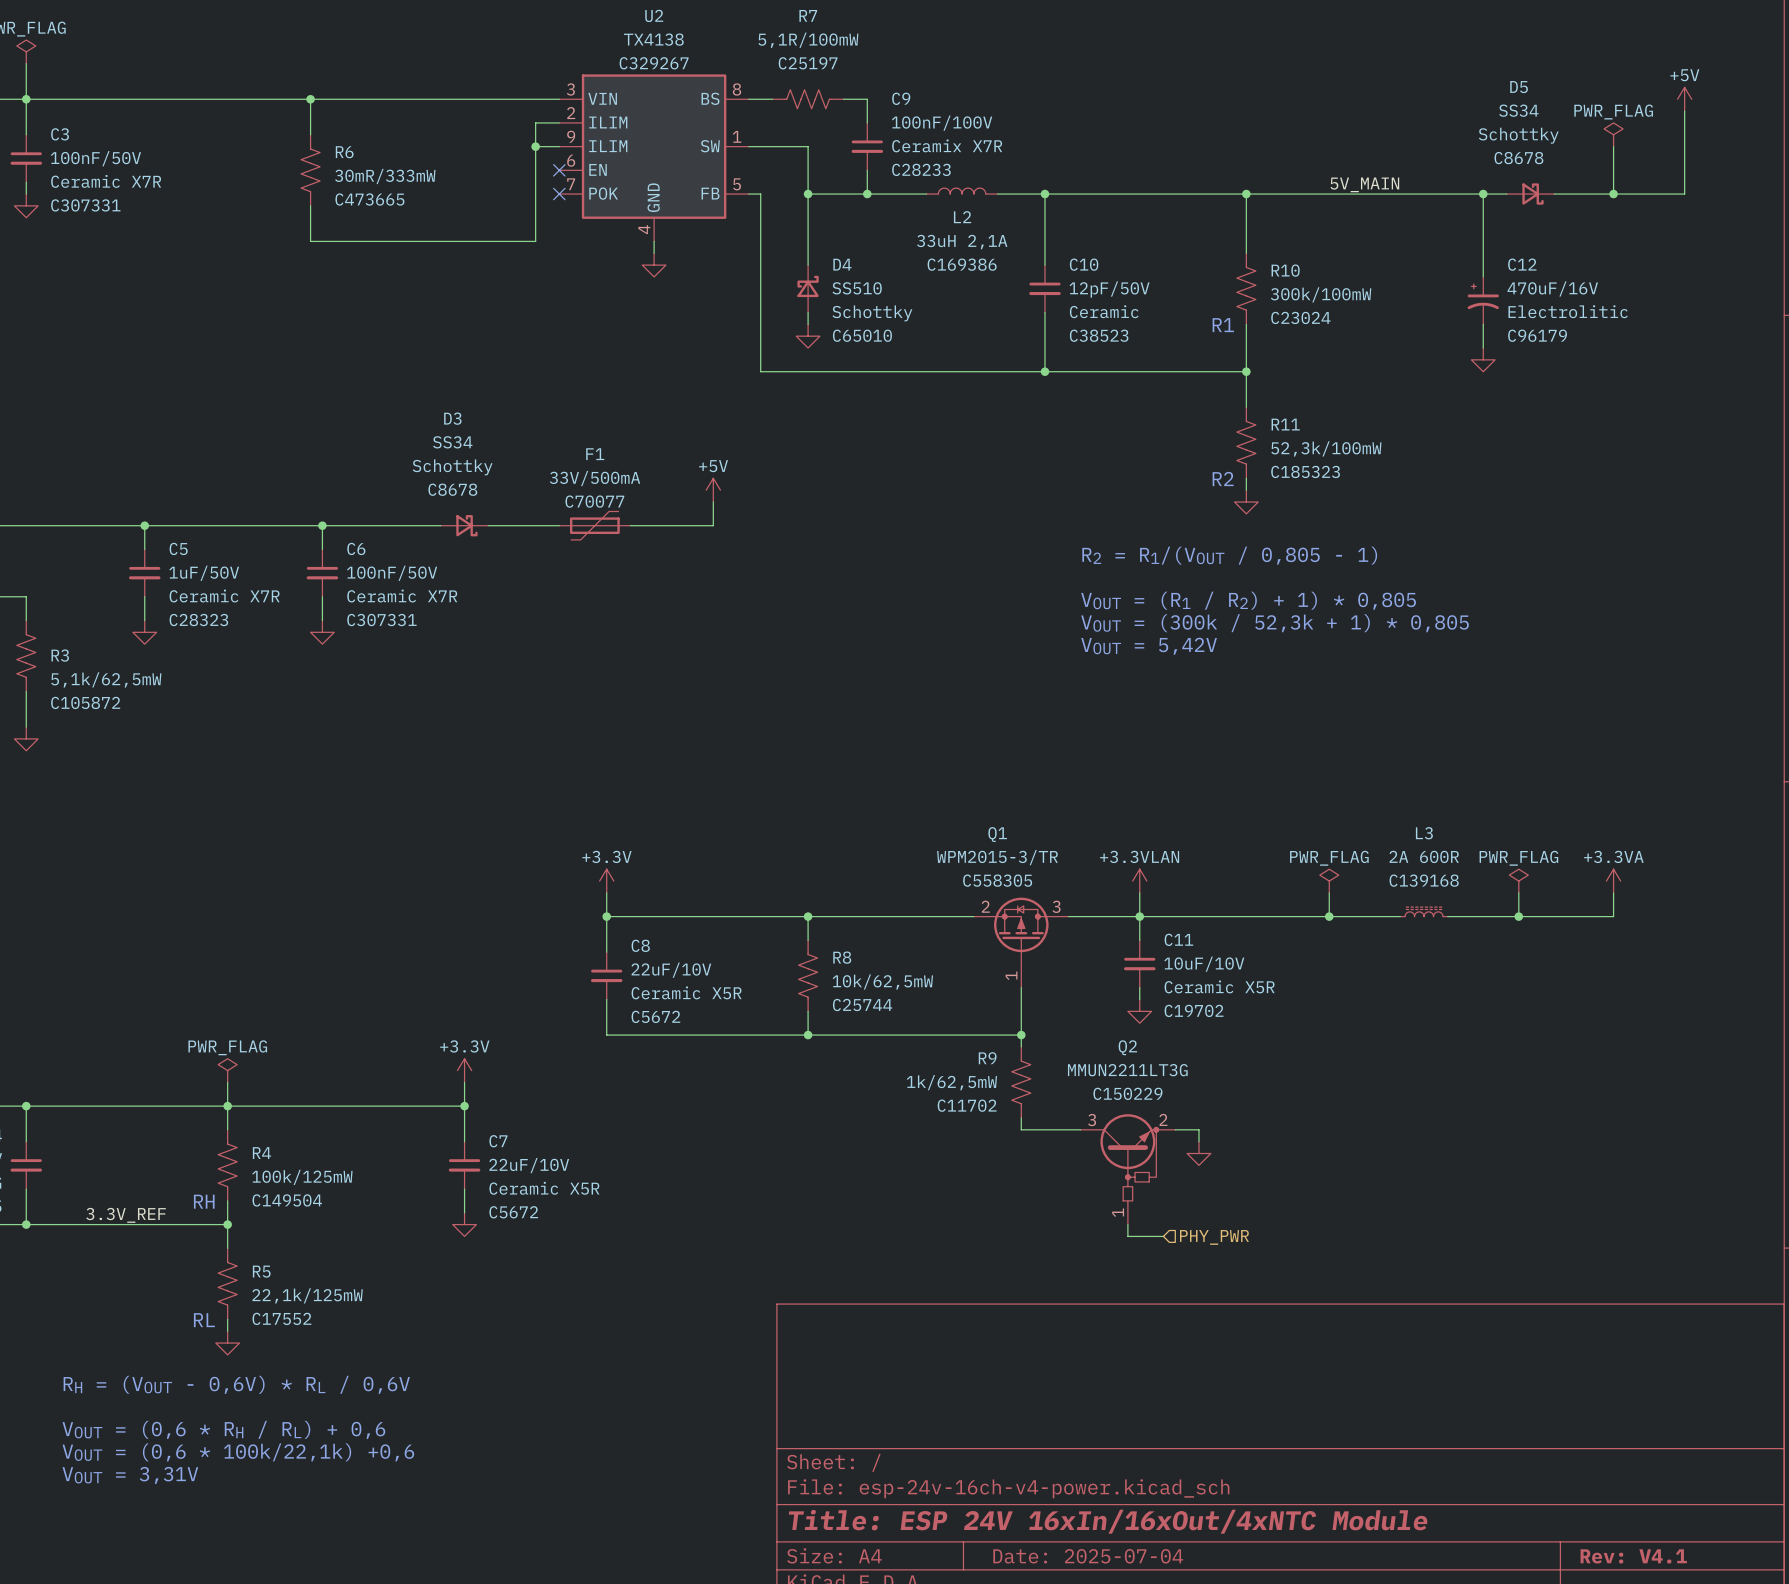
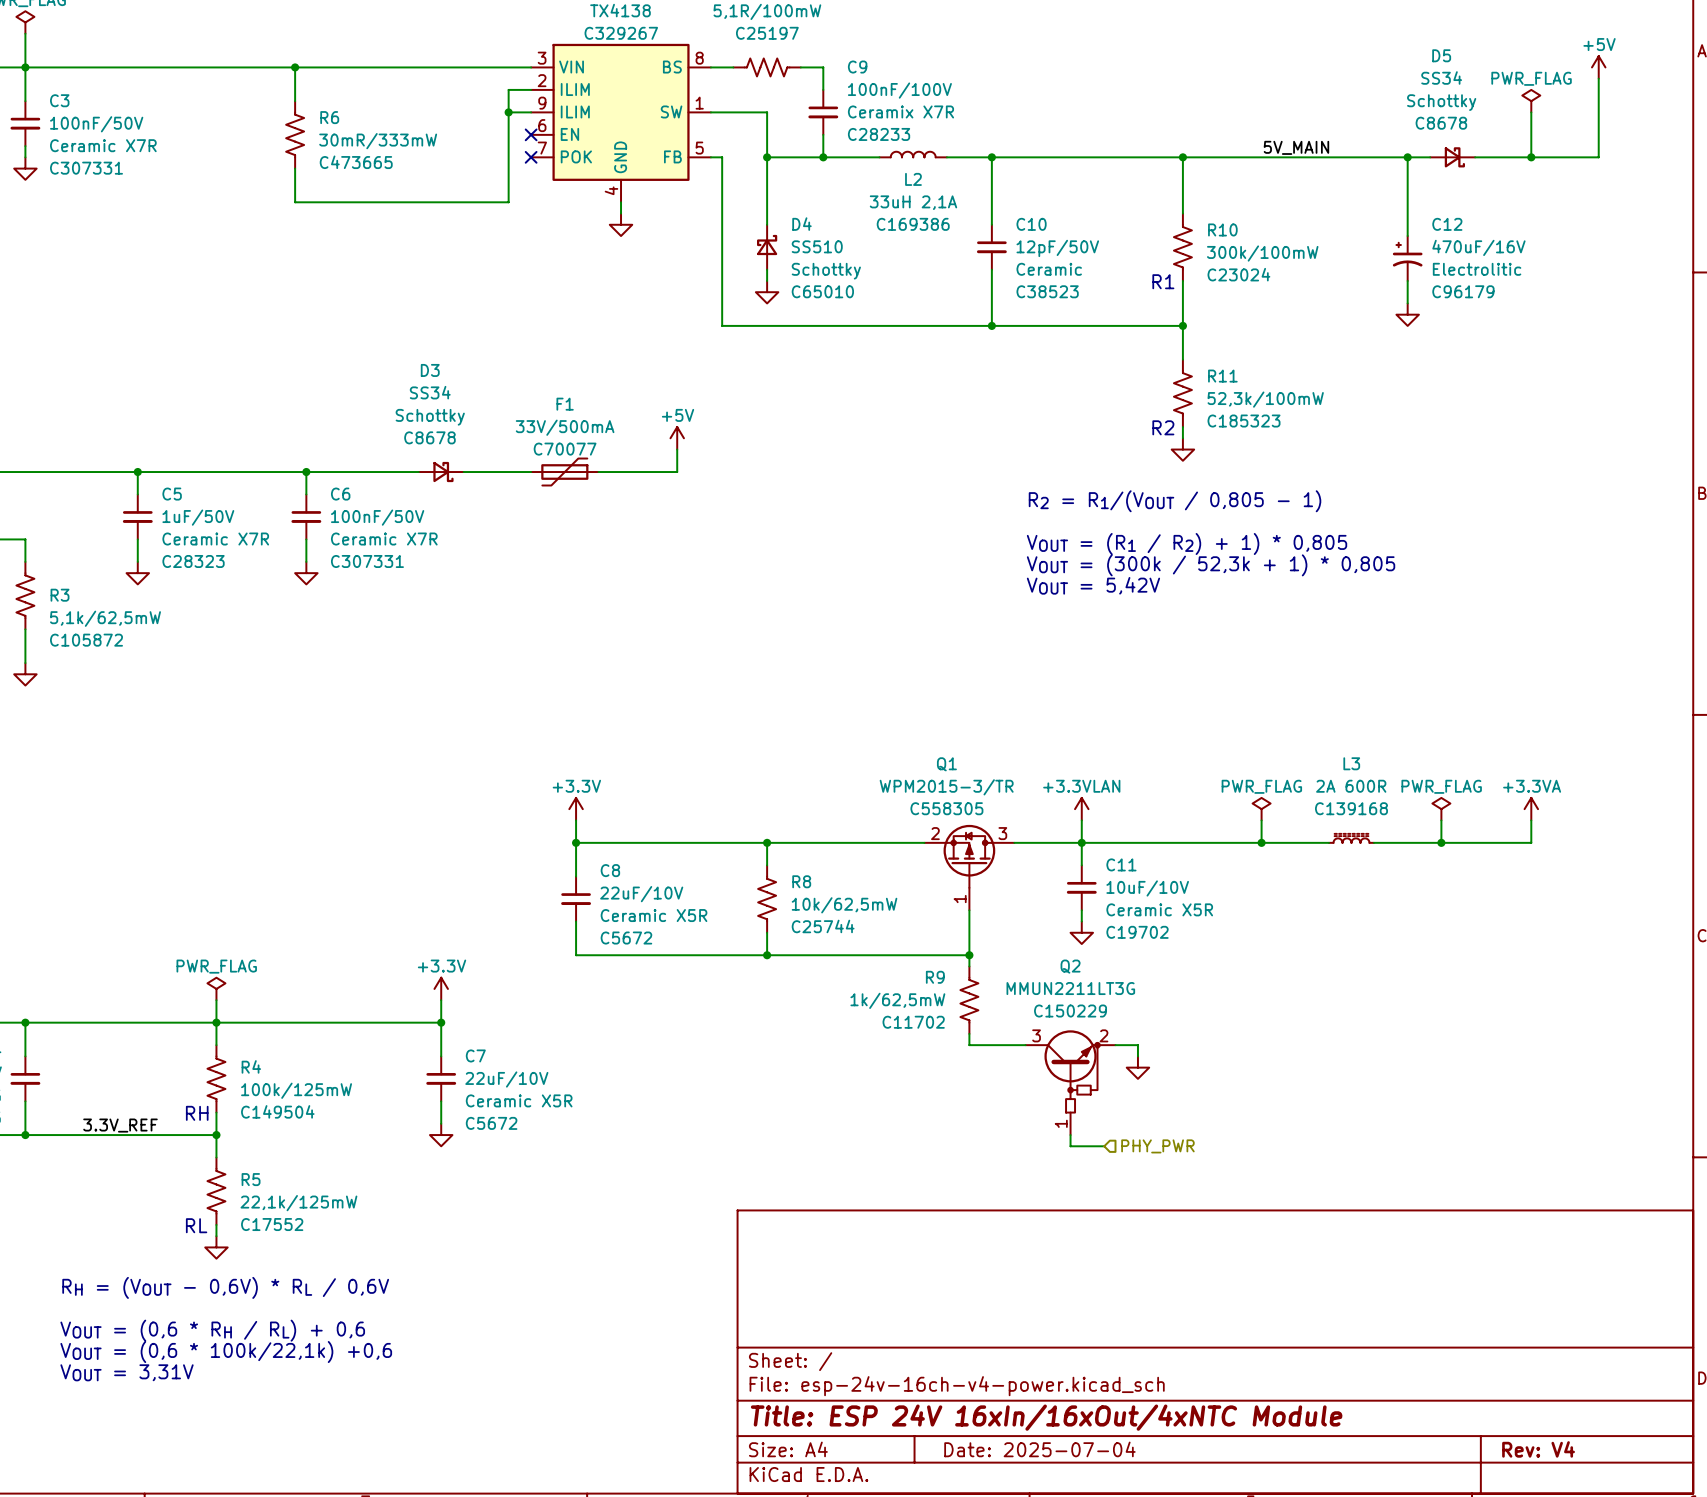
title block: Rev: V4.1 (1633, 1556) -> Rev: V4 (1538, 1449)

